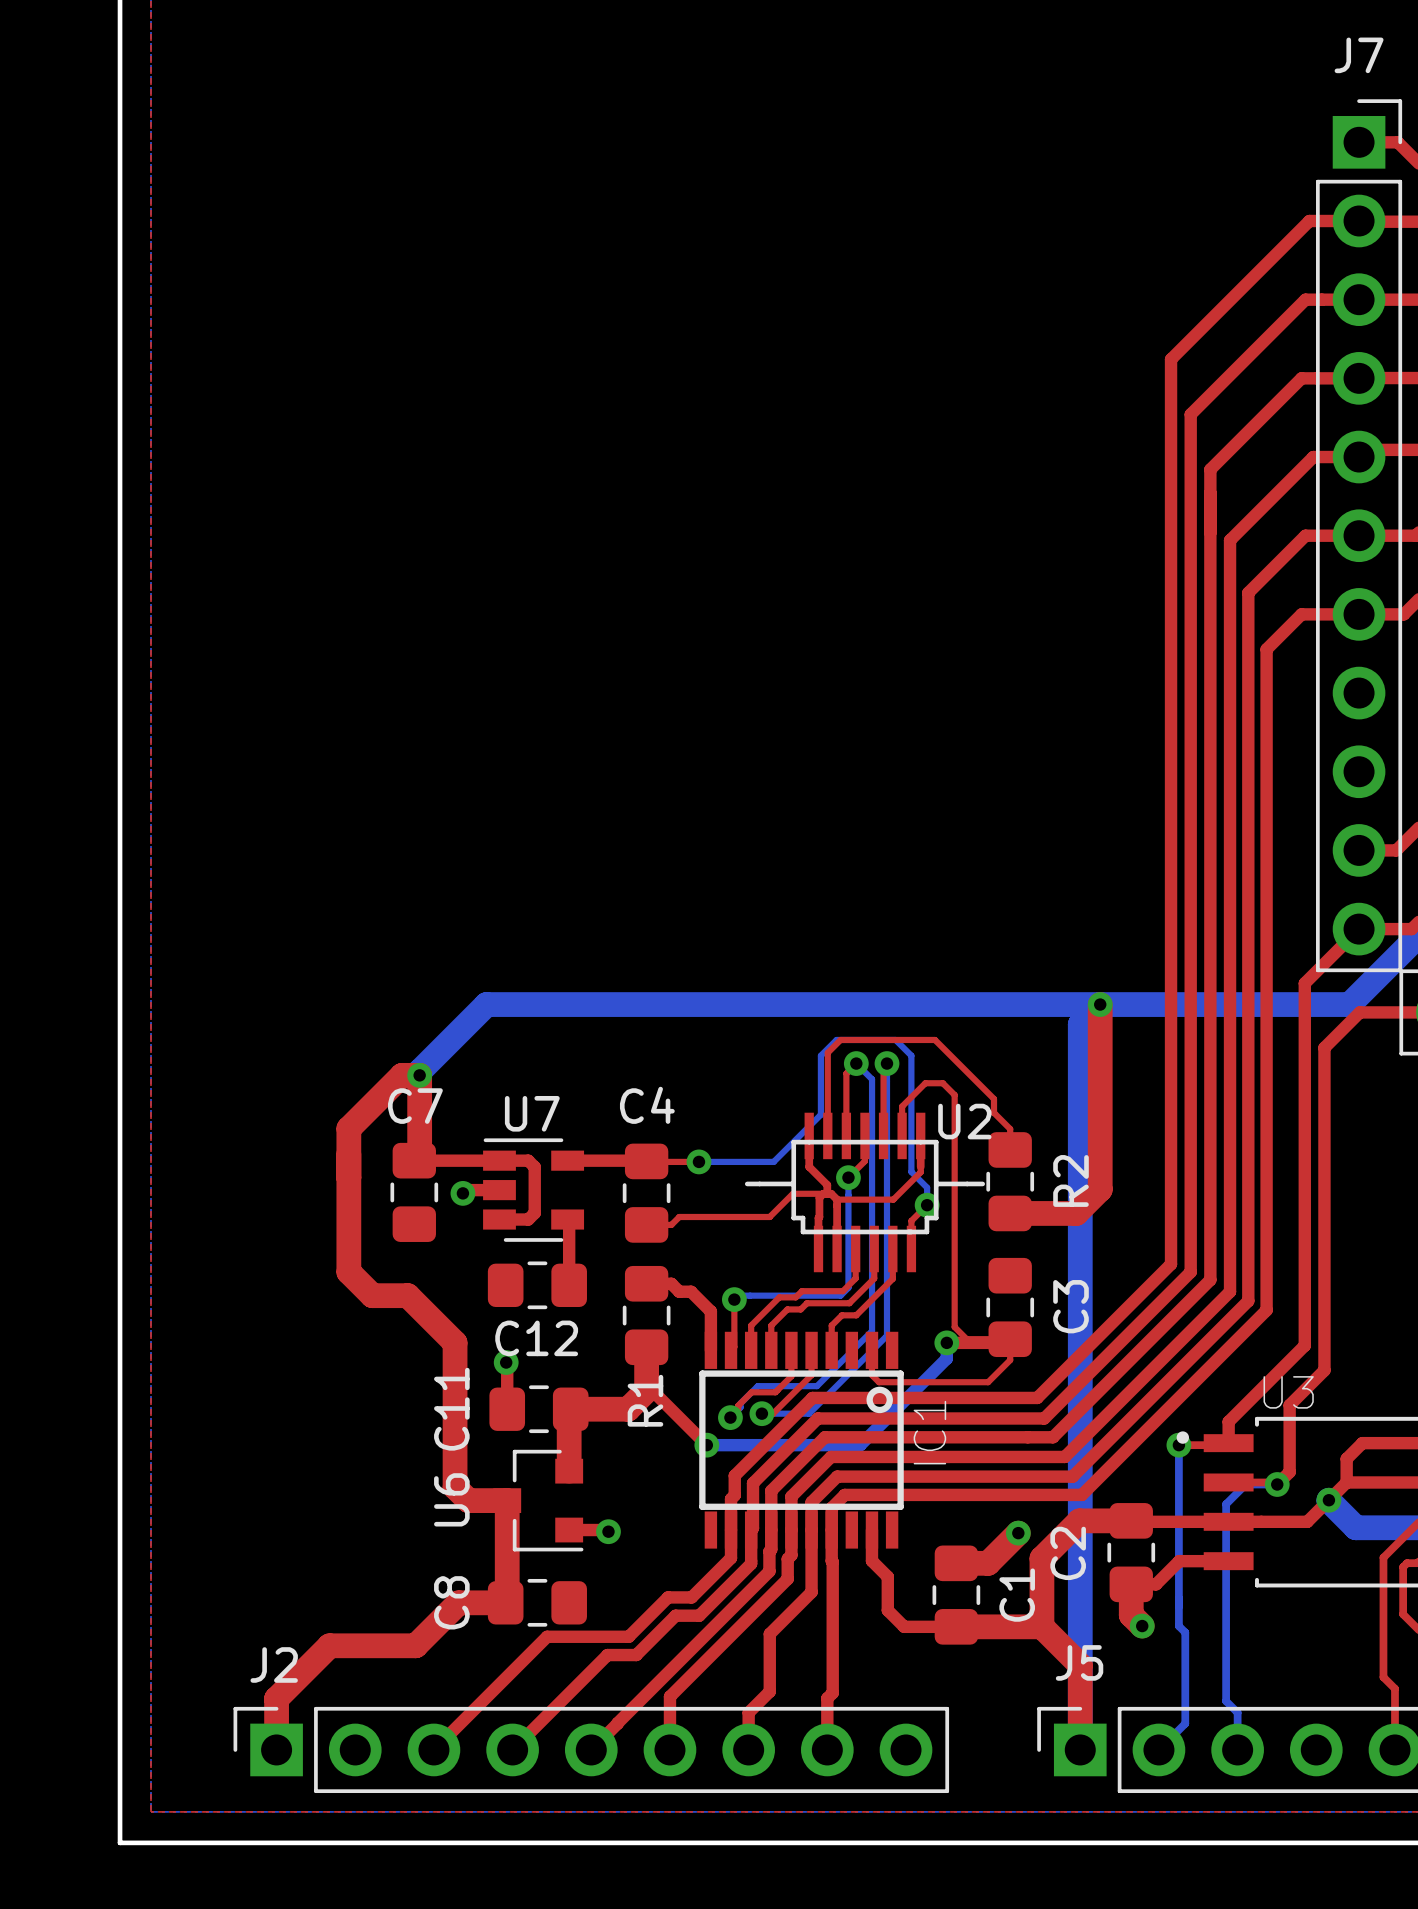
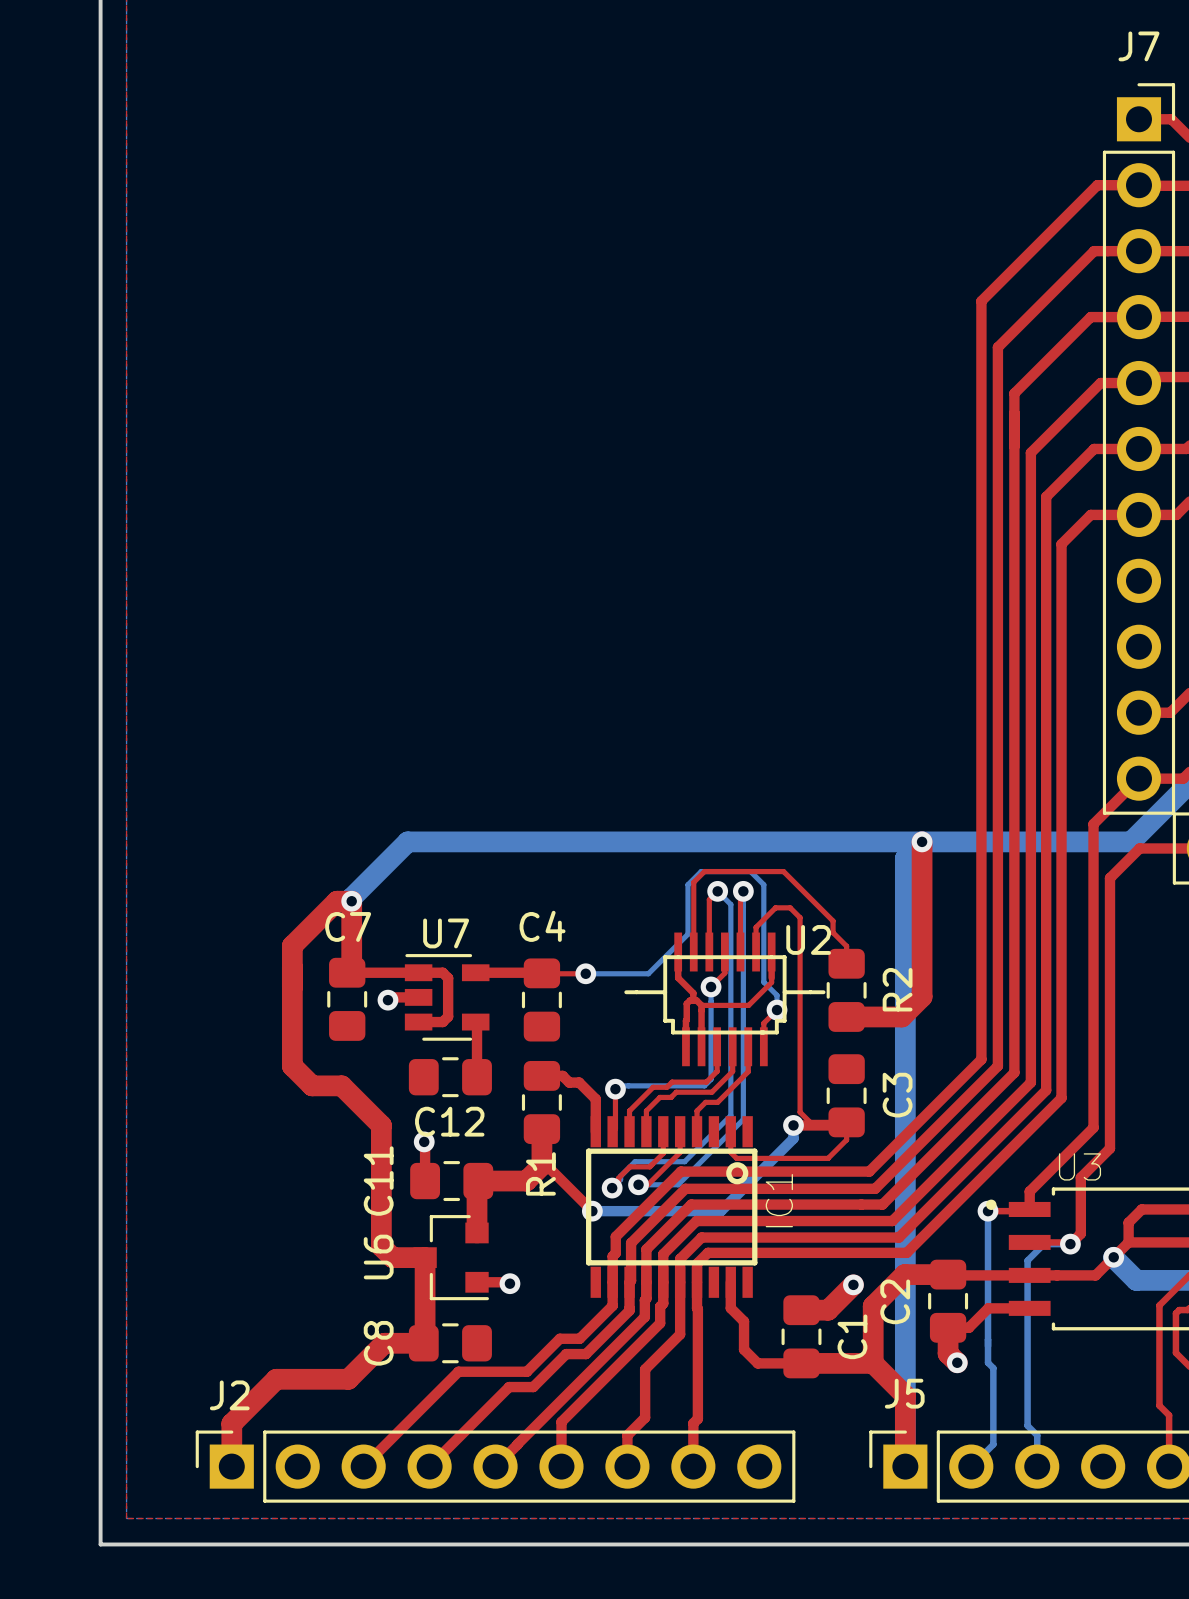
top track: (823, 1193) (792, 1193) (769, 1216) (679, 1216) (671, 1224) (646, 1224) -> none

